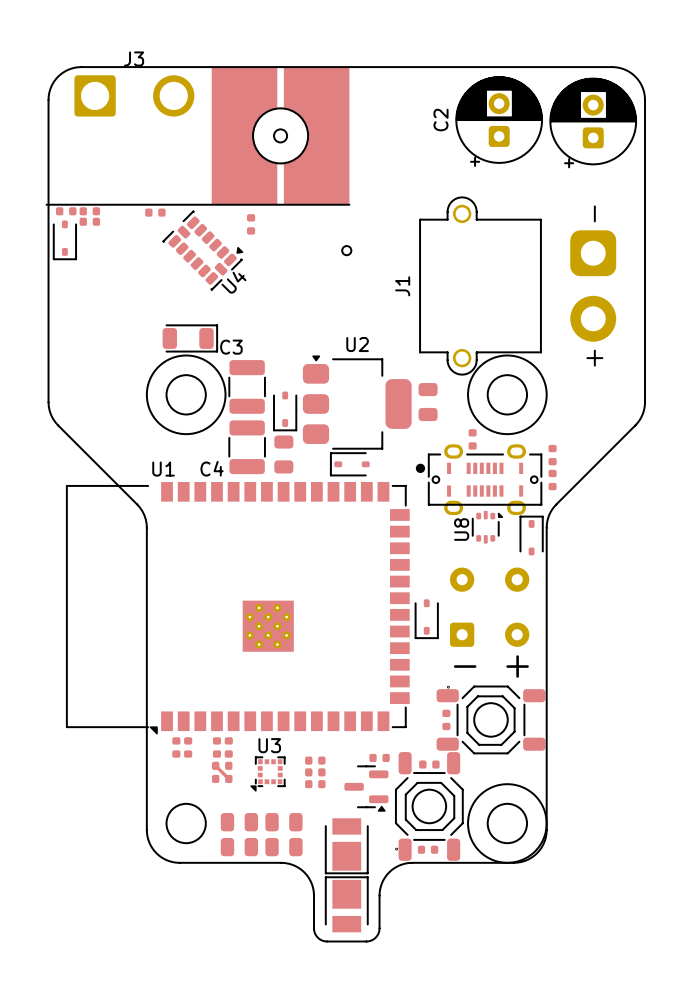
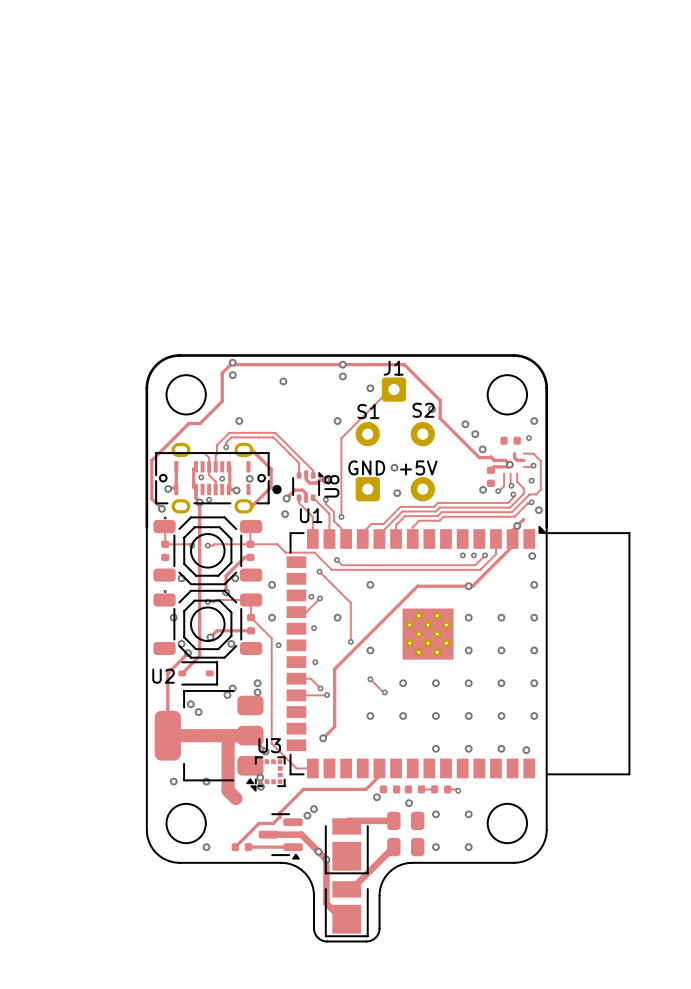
J3: (134, 95) -> none
C2: (499, 121) -> none
part: (593, 122) -> none
round board edge: [274, 129, 288, 143] -> none
part: (280, 135) -> none
J1 footprint: [419, 196, 617, 376] -> [381, 377, 407, 402]
line: (46, 204) (349, 204) -> none
part: (66, 211) -> none
part: (89, 211) -> none
part: (155, 212) -> none
part: (89, 221) -> none
part: (251, 224) -> none
part: (64, 240) -> none
round board edge: [342, 246, 352, 256] -> none
U4: (202, 250) -> none
J1 name position: J1 (402, 286) -> J1 (393, 368)
part: (190, 338) -> none
U2 name position: U2 (357, 344) -> U2 (163, 676)
drawing: [146, 354, 227, 435] -> none
drawing: [467, 354, 548, 435] -> none
via: none -> (232, 362)
via: none -> (342, 364)
via: none -> (232, 375)
via: none -> (342, 376)
via: none -> (283, 381)
C3: (247, 386) -> none
via: none -> (370, 388)
track: none -> (393, 389) (390, 389) (341, 438) (341, 517)
U2 rotation: 0° (357, 402) -> 180° (209, 737)
U2 position: (357, 402) -> (209, 737)
part: (428, 402) -> none
via: none -> (431, 409)
text: none -> S2 (423, 410)
part: (285, 411) -> none
text: none -> S1 (368, 411)
via: none -> (239, 421)
via: none -> (337, 421)
via: none -> (534, 421)
via: none -> (465, 424)
via: none -> (475, 434)
via: none -> (529, 438)
part: (472, 439) -> none
part: none -> (510, 440)
part footprint: [415, 444, 543, 516] -> [486, 466, 496, 487]
track: none -> (226, 447) (226, 442) (231, 437) (273, 437) (299, 463) (299, 475)
via: none -> (226, 447)
C4: (247, 447) -> none
track: none -> (243, 449) (251, 449) (271, 469) (271, 487) (251, 506) (243, 506)
via: none -> (482, 449)
track: none -> (205, 453) (209, 457) (209, 475) (215, 481) (215, 489)
track: none -> (514, 453) (517, 460) (523, 460)
track: none -> (523, 453) (533, 453) (540, 461) (540, 489) (536, 494) (529, 494) (511, 512) (441, 512) (437, 516) (405, 516) (396, 525) (396, 539)
part: (283, 454) -> none
part: (552, 455) -> none
part: (349, 464) -> none
via: none -> (509, 464)
track: none -> (533, 465) (523, 466)
via: none -> (533, 465)
track: none -> (176, 466) (176, 489) (167, 488)
track: none -> (196, 466) (193, 469) (193, 487) (196, 489) (196, 498) (199, 502) (199, 655) (182, 673)
track: none -> (215, 466) (216, 445) (229, 432) (275, 432) (313, 470) (313, 475)
track: none -> (228, 466) (228, 489) (236, 490)
text: none -> GND (366, 467)
via: none -> (394, 467)
text: none -> +5V (418, 467)
U1 name position: U1 (163, 469) -> U1 (311, 515)
track: none -> (490, 470) (494, 466) (507, 466) (509, 464) (505, 460) (494, 460) (490, 457) (479, 457) (440, 418) (440, 400) (404, 364) (234, 364) (232, 362) (222, 373) (222, 401) (200, 423) (188, 423) (151, 460) (151, 498) (161, 508)
track: none -> (504, 473) (504, 486) (498, 491)
track: none -> (510, 473) (511, 485)
track: none -> (517, 473) (517, 481) (523, 488) (523, 493) (510, 507) (439, 507) (435, 511) (402, 511) (379, 534) (379, 539)
track: none -> (306, 474) (306, 479) (309, 482) (325, 480)
via: none -> (201, 477)
part: none -> (218, 478)
via: none -> (222, 478)
via: none -> (249, 478)
via: none -> (325, 480)
via: none -> (531, 480)
part: (552, 480) -> none
via: none -> (511, 485)
via: none -> (168, 488)
via: none -> (483, 489)
via: none -> (236, 490)
via: none -> (498, 491)
via: none -> (397, 493)
track: none -> (513, 494) (513, 497) (508, 502) (437, 502) (434, 506) (400, 506) (383, 523) (371, 523) (362, 532) (362, 539)
via: none -> (513, 494)
track: none -> (299, 497) (299, 503) (312, 516) (312, 539)
track: none -> (313, 497) (329, 514) (329, 539)
track: none -> (286, 498) (294, 490) (302, 490) (306, 493) (306, 498)
via: none -> (286, 498)
via: none -> (209, 499)
track: none -> (325, 499) (325, 503) (334, 512) (334, 521) (346, 533) (346, 539)
via: none -> (325, 499)
via: none -> (199, 502)
track: none -> (531, 502) (527, 503) (514, 516) (443, 516) (439, 520) (419, 520) (412, 527) (412, 539)
via: none -> (531, 502)
via: none -> (161, 508)
via: none -> (538, 510)
via: none -> (285, 514)
via: none -> (341, 517)
track: none -> (523, 519) (512, 530) (512, 546) (472, 586) (417, 586) (334, 669) (334, 726) (323, 738)
via: none -> (517, 525)
track: none -> (164, 526) (165, 544) (192, 545)
track: none -> (251, 526) (250, 544)
board edge: (146, 527) (145, 519) (140, 507) (58, 425) (52, 418) (48, 406) (48, 96) (51, 85) (58, 76) (67, 70) (77, 67) (612, 67) (626, 70) (635, 76) (643, 89) (645, 99) (644, 408) (635, 425) (554, 506) (549, 515) (546, 527) -> (146, 527) (147, 380) (151, 370) (159, 362) (168, 357) (179, 355) (513, 355) (528, 358) (541, 370) (546, 384) (546, 527)
U8 position: (487, 527) -> (307, 486)
U8 name position: U8 (461, 529) -> U8 (331, 486)
part: (531, 535) -> none
track: none -> (495, 539) (495, 554) (480, 569) (331, 569) (314, 552) (285, 552) (277, 544) (207, 545)
via: none -> (192, 545)
via: none -> (207, 545)
part: none -> (165, 550)
part: none -> (207, 550)
part: none -> (250, 550)
via: none -> (462, 555)
via: none -> (473, 555)
track: none -> (485, 555) (475, 565) (342, 565) (336, 560)
via: none -> (485, 555)
via: none -> (532, 556)
track: none -> (250, 557) (244, 557) (226, 575) (226, 592)
via: none -> (336, 560)
track: none -> (319, 571) (350, 603) (350, 641)
via: none -> (319, 571)
via: none -> (181, 578)
via: none -> (235, 578)
via: none -> (272, 584)
via: none -> (370, 584)
via: none -> (534, 584)
via: none -> (468, 586)
via: none -> (226, 592)
via: none -> (311, 596)
track: none -> (320, 598) (306, 612) (296, 612)
via: none -> (320, 598)
track: none -> (207, 601) (216, 599) (251, 599) (251, 617) (271, 638) (271, 743) (296, 768) (312, 768)
via: none -> (207, 601)
part position: (489, 607) -> (395, 461)
U1 rotation: 0° (237, 608) -> 180° (458, 652)
U1 position: (237, 608) -> (458, 652)
via: none -> (173, 617)
via: none -> (272, 617)
via: none -> (337, 617)
via: none -> (468, 617)
via: none -> (501, 617)
via: none -> (534, 617)
part: (426, 619) -> none
part: none -> (207, 624)
part: none -> (251, 624)
via: none -> (314, 628)
track: none -> (251, 630) (216, 630) (210, 637)
via: none -> (210, 637)
via: none -> (350, 641)
via: none -> (181, 643)
via: none -> (231, 643)
via: none -> (278, 645)
via: none -> (370, 650)
via: none -> (468, 650)
via: none -> (501, 650)
via: none -> (534, 650)
track: none -> (188, 653) (167, 673) (167, 735) (250, 735) (265, 751)
via: none -> (188, 653)
via: none -> (315, 662)
text: + - (491, 666) -> none
part: none -> (198, 673)
track: none -> (296, 678) (310, 678) (320, 688)
track: none -> (370, 679) (384, 692)
via: none -> (370, 679)
via: none -> (257, 683)
via: none -> (403, 683)
via: none -> (435, 683)
via: none -> (468, 683)
via: none -> (501, 683)
via: none -> (534, 683)
via: none -> (232, 688)
via: none -> (320, 688)
via: none -> (257, 692)
via: none -> (384, 692)
via: none -> (227, 695)
track: none -> (327, 695) (296, 695)
via: none -> (327, 695)
via: none -> (190, 704)
via: none -> (198, 712)
via: none -> (370, 716)
via: none -> (403, 716)
via: none -> (435, 716)
via: none -> (468, 716)
via: none -> (501, 716)
via: none -> (534, 716)
part: (446, 719) -> none
part: (490, 719) -> none
track: none -> (232, 735) (228, 740) (228, 790) (235, 798)
via: none -> (323, 738)
part: (176, 747) -> none
part: (188, 747) -> none
part: (216, 747) -> none
part: (228, 747) -> none
via: none -> (435, 748)
via: none -> (468, 748)
via: none -> (501, 748)
via: none -> (526, 750)
via: none -> (265, 751)
part: (379, 757) -> none
part: (315, 760) -> none
part: (429, 764) -> none
track: (215, 765) (228, 778) -> none
part: (222, 765) -> none
track: none -> (379, 768) (379, 776) (366, 789) (303, 789) (279, 813) (279, 816) (273, 823) (258, 823) (235, 847)
part: (315, 772) -> none
via: none -> (260, 777)
part: (222, 778) -> none
via: none -> (173, 781)
via: none -> (206, 781)
drawing: [467, 783, 548, 864] -> none
part: (315, 784) -> none
via: none -> (260, 786)
part position: (366, 788) -> (280, 836)
part: none -> (390, 789)
part: none -> (414, 789)
track: none -> (421, 789) (434, 789)
part: none -> (441, 789)
track: none -> (447, 789) (458, 790)
via: none -> (458, 790)
via: none -> (376, 797)
via: none -> (409, 803)
part: (429, 806) -> none
via: none -> (314, 809)
via: none -> (435, 814)
via: none -> (468, 814)
via: none -> (307, 815)
track: none -> (393, 820) (348, 820) (346, 822)
part: none -> (405, 820)
part: (239, 822) -> none
part: (283, 822) -> none
track: none -> (268, 834) (301, 834) (326, 859) (326, 903) (342, 919) (346, 919)
part footprint: [220, 837, 259, 857] -> [231, 843, 253, 852]
via: none -> (206, 847)
track: none -> (248, 847) (293, 847)
part: (283, 847) -> none
track: none -> (393, 847) (351, 889) (346, 889)
part: none -> (405, 847)
via: none -> (435, 847)
via: none -> (468, 847)
part: (428, 849) -> none
via: none -> (318, 851)
via: none -> (326, 859)
part rotation: 0° (346, 904) -> 180° (346, 909)

